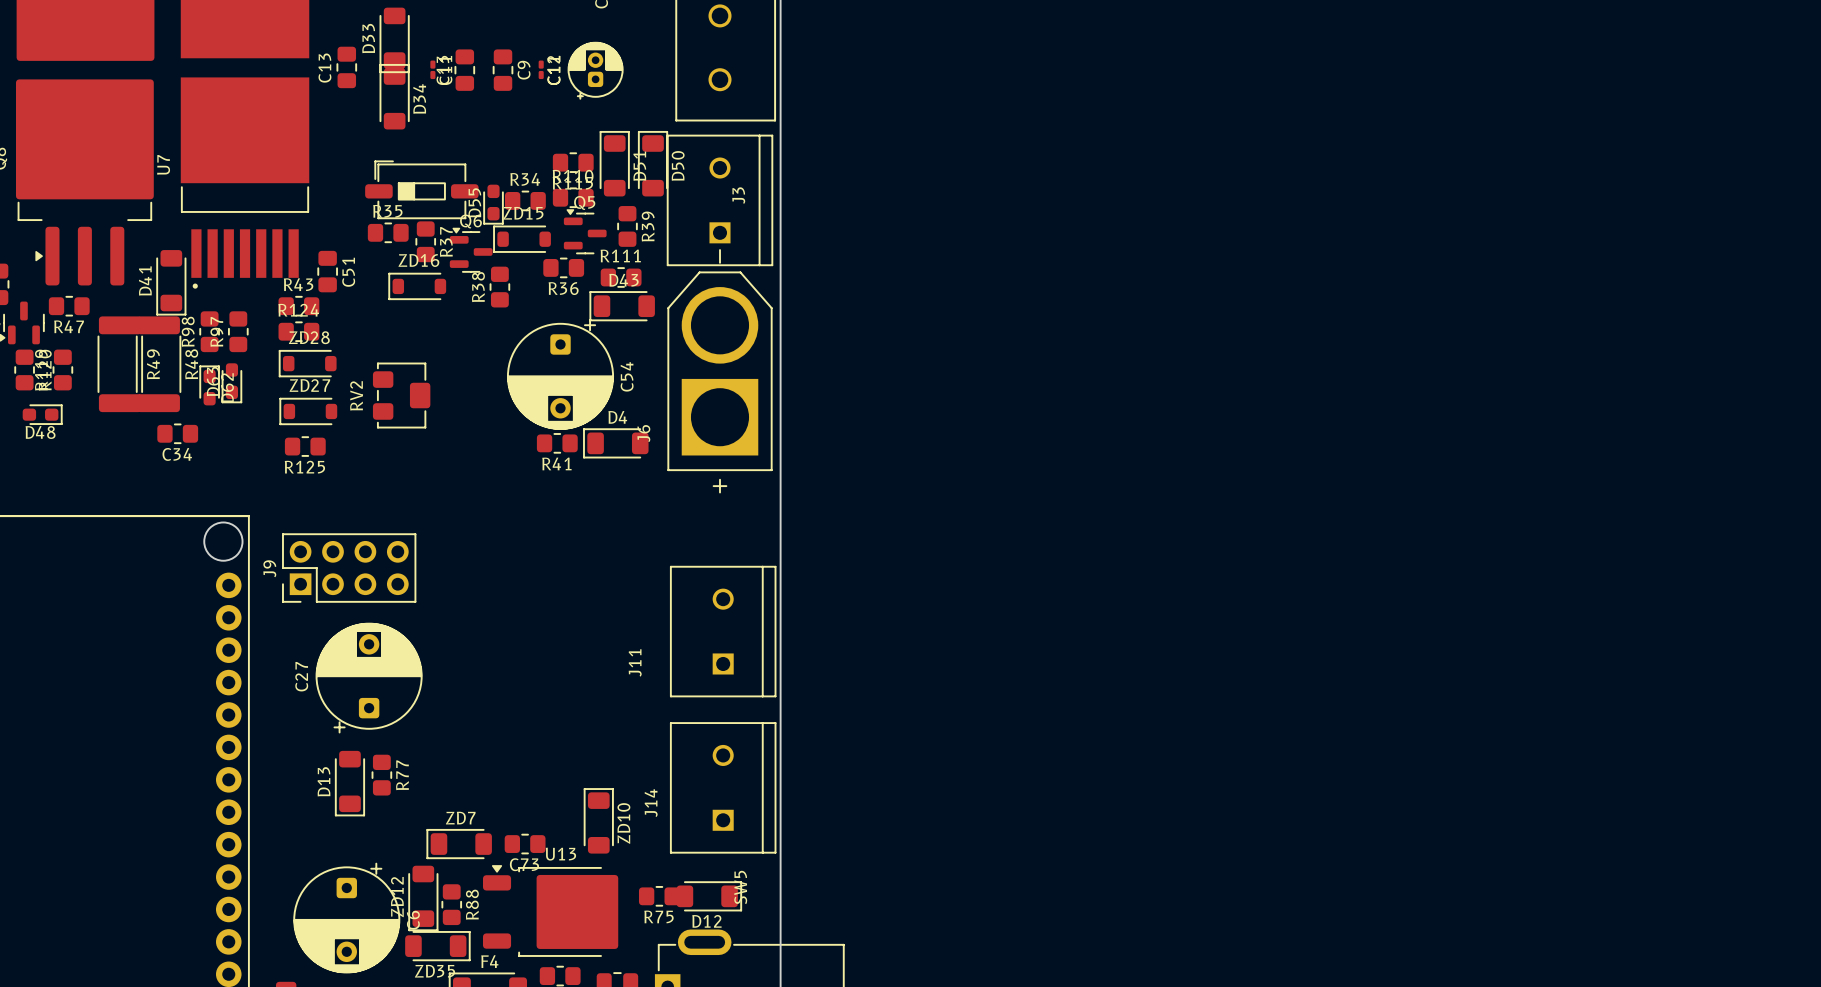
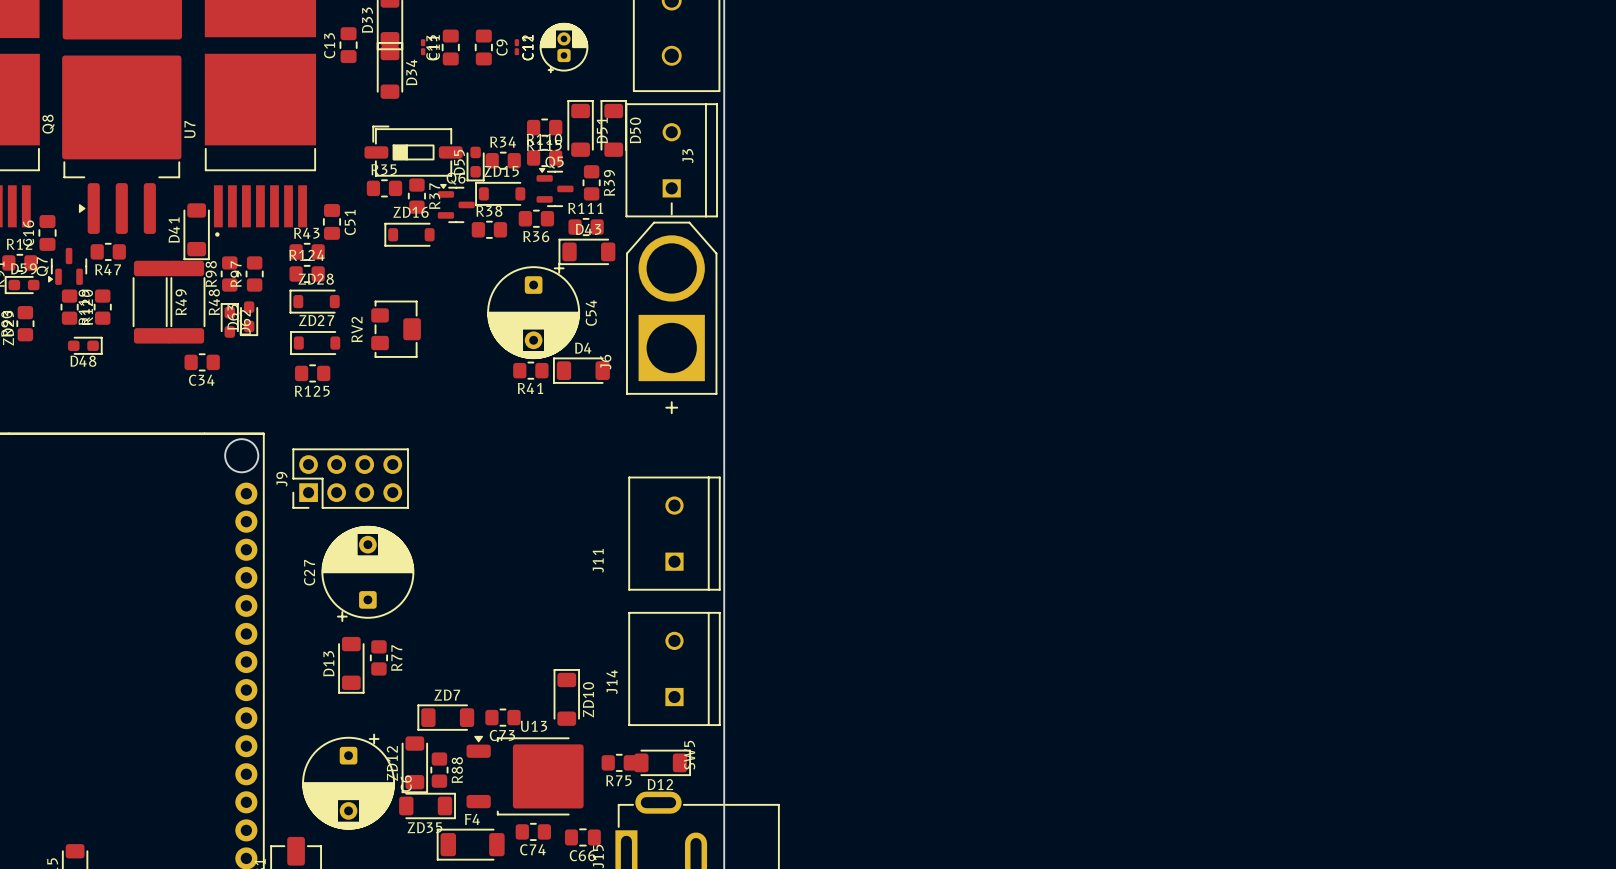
R38 rotation: 0° (499, 287) -> 90° clockwise (489, 229)

